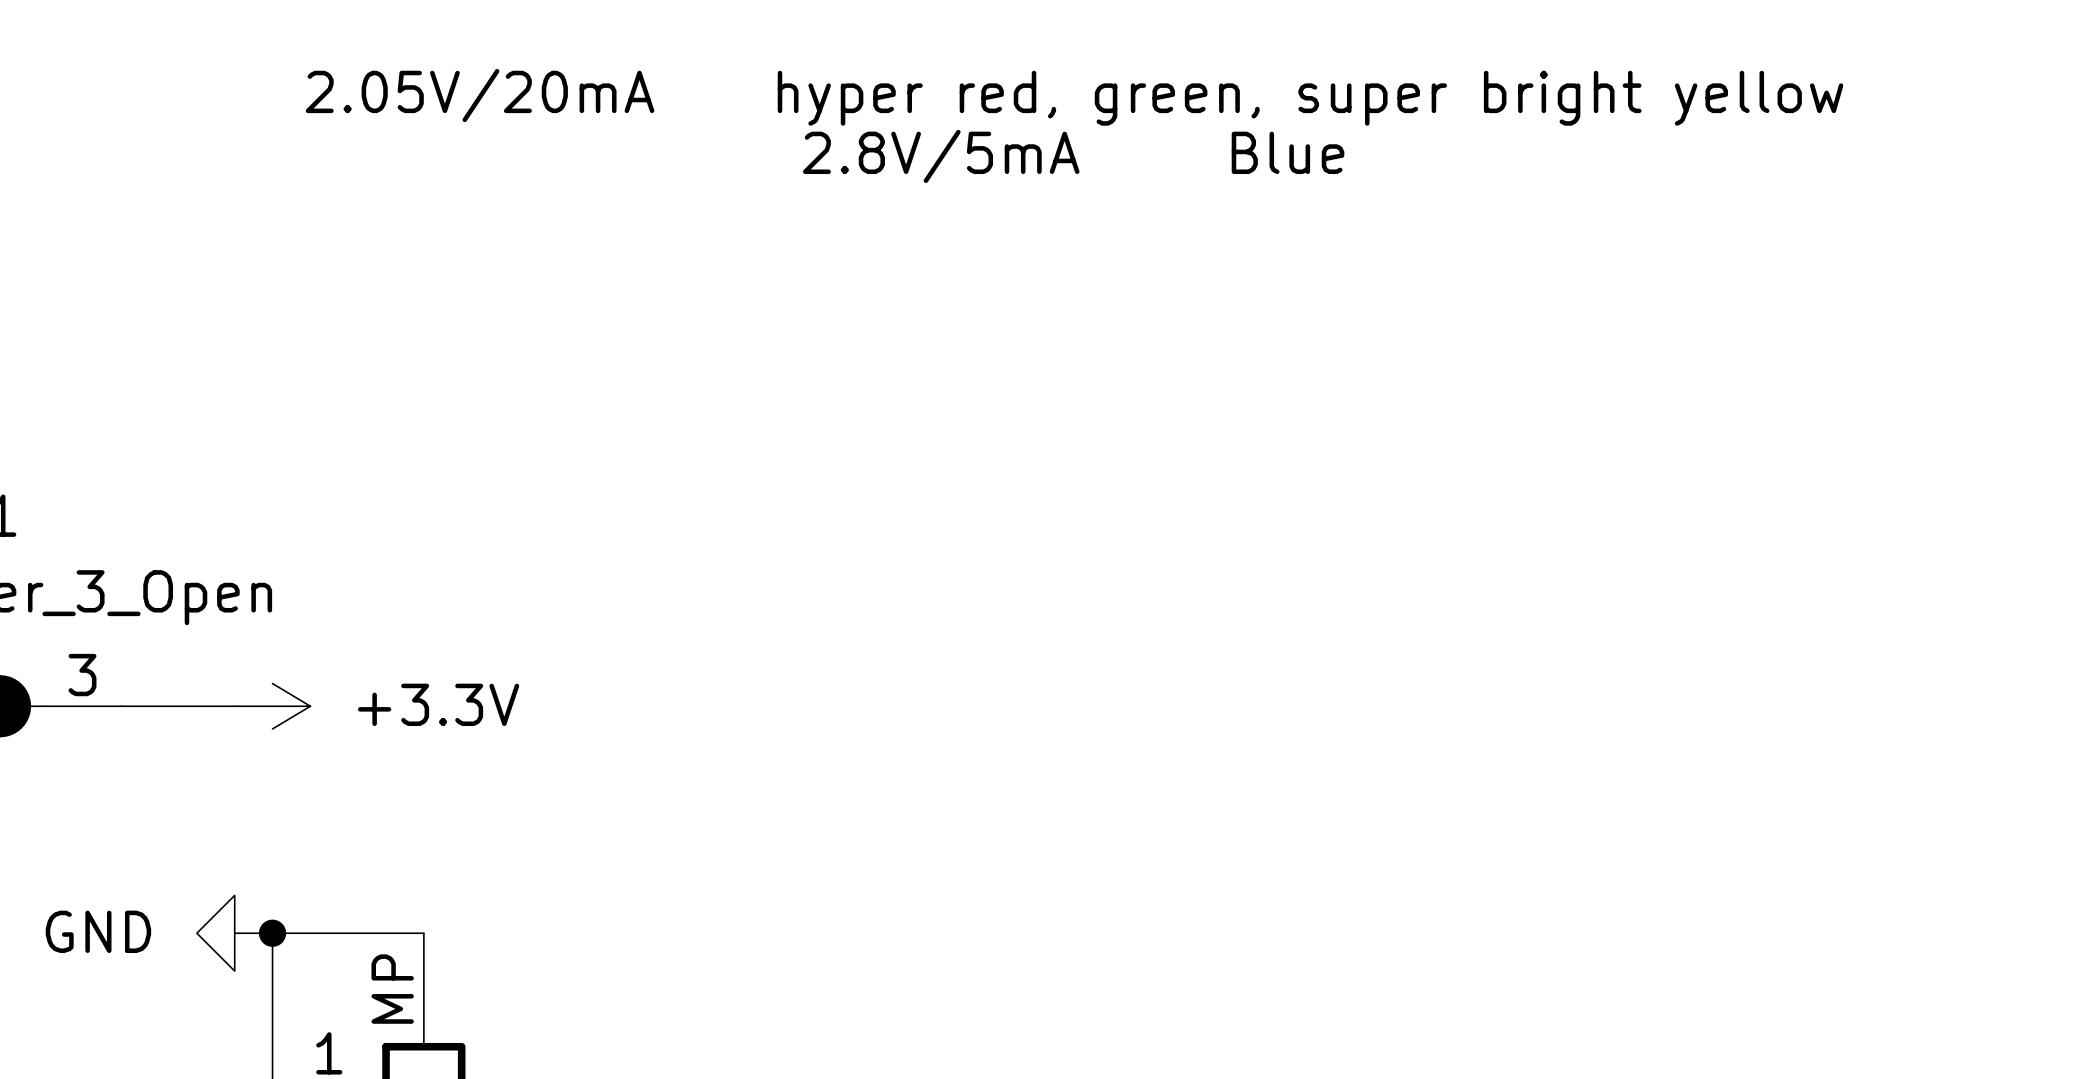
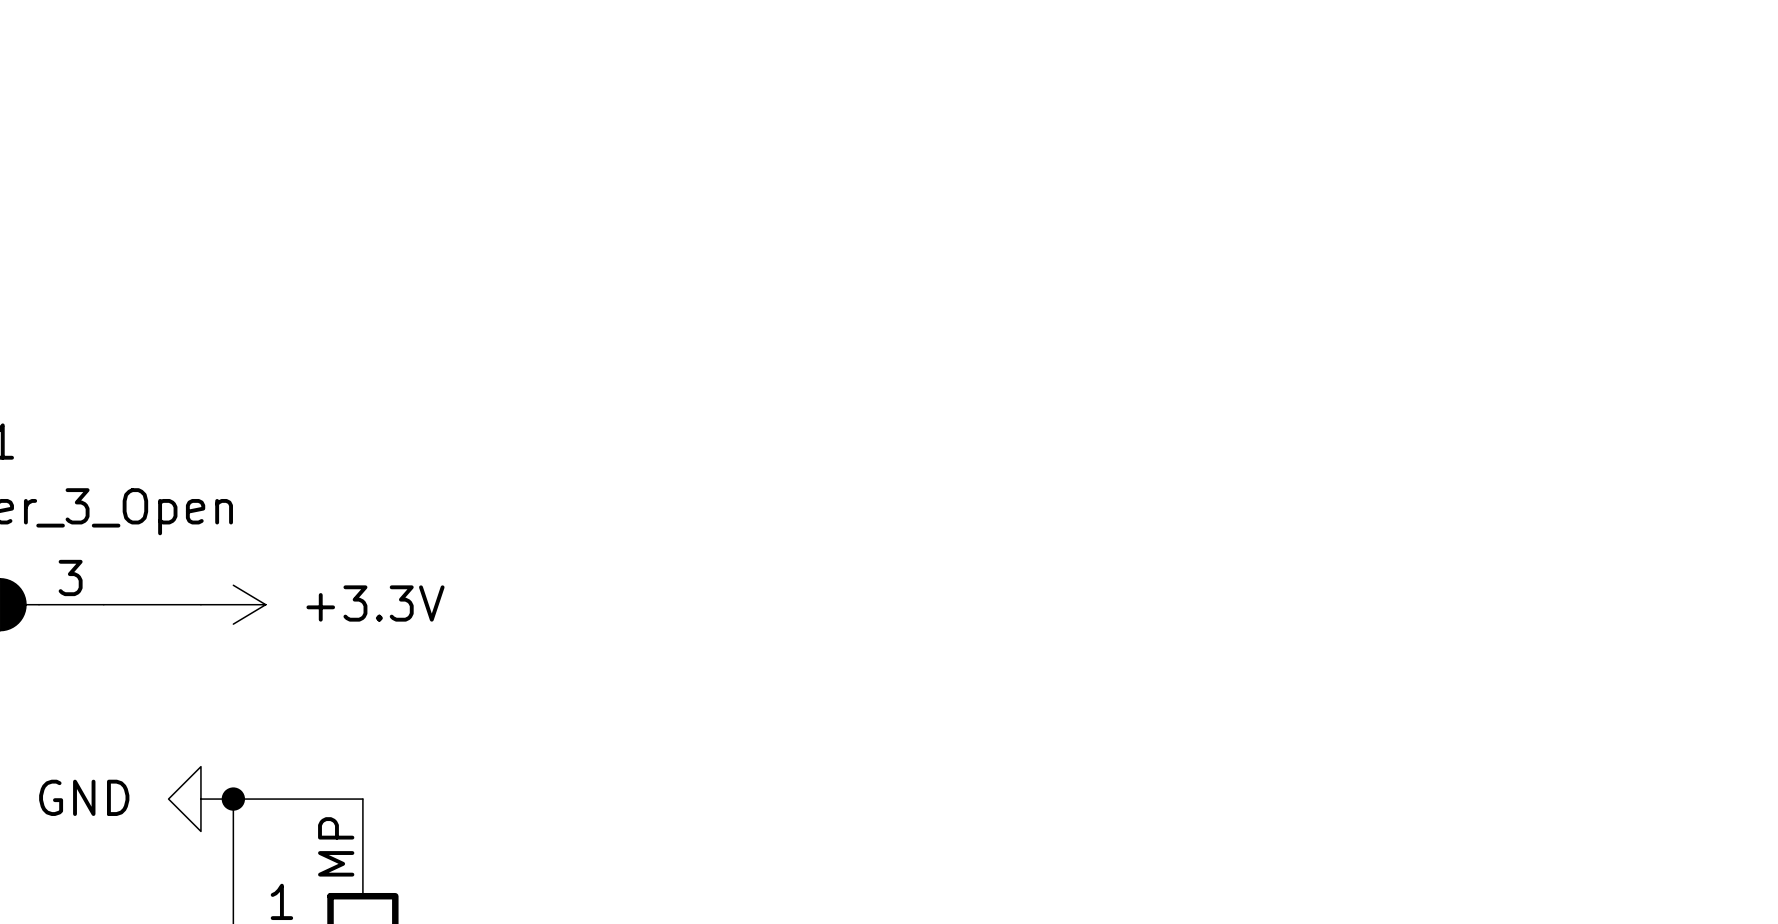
text: 2.05V/20mA hyper red, green, super bright yellow (1074, 97) -> none
text: 2.8V/5mA Blue (1073, 156) -> none

